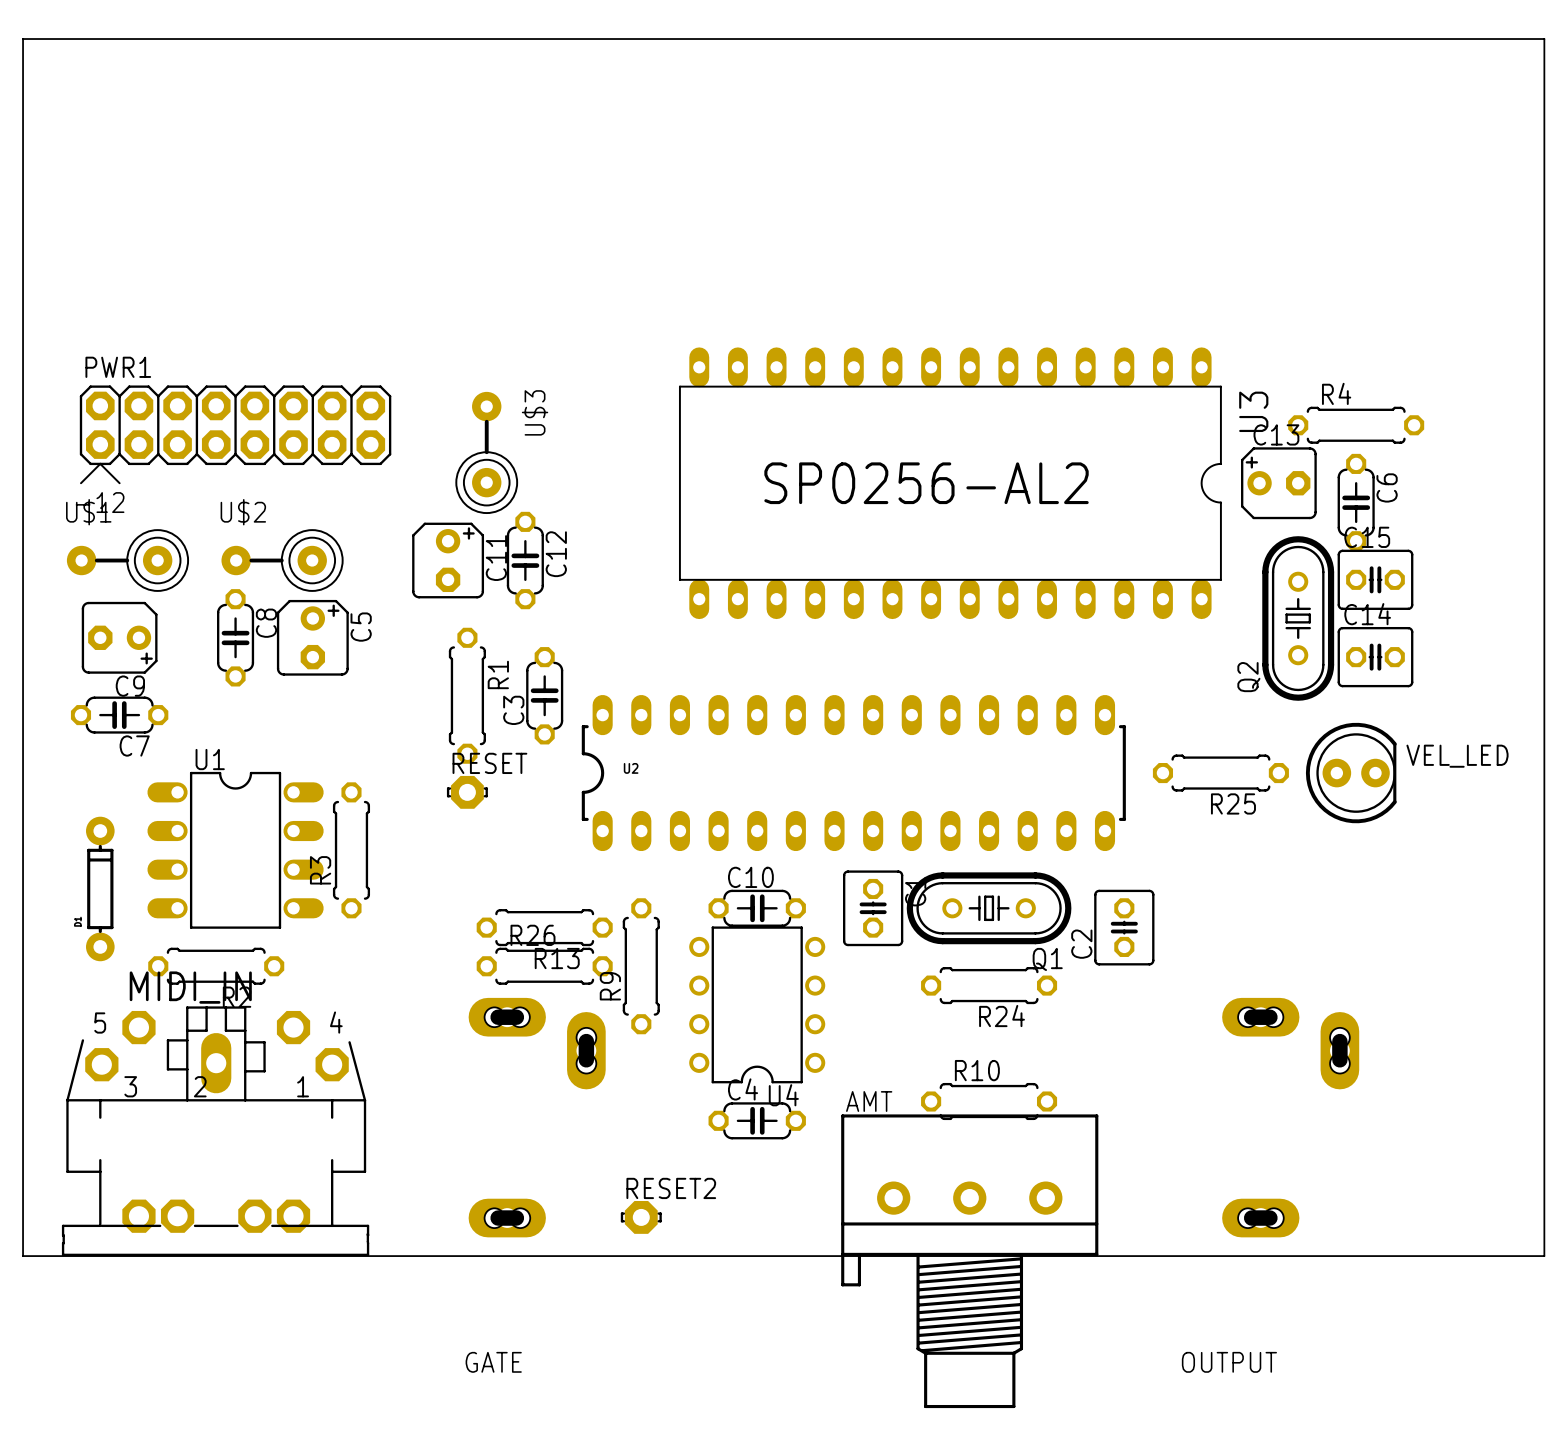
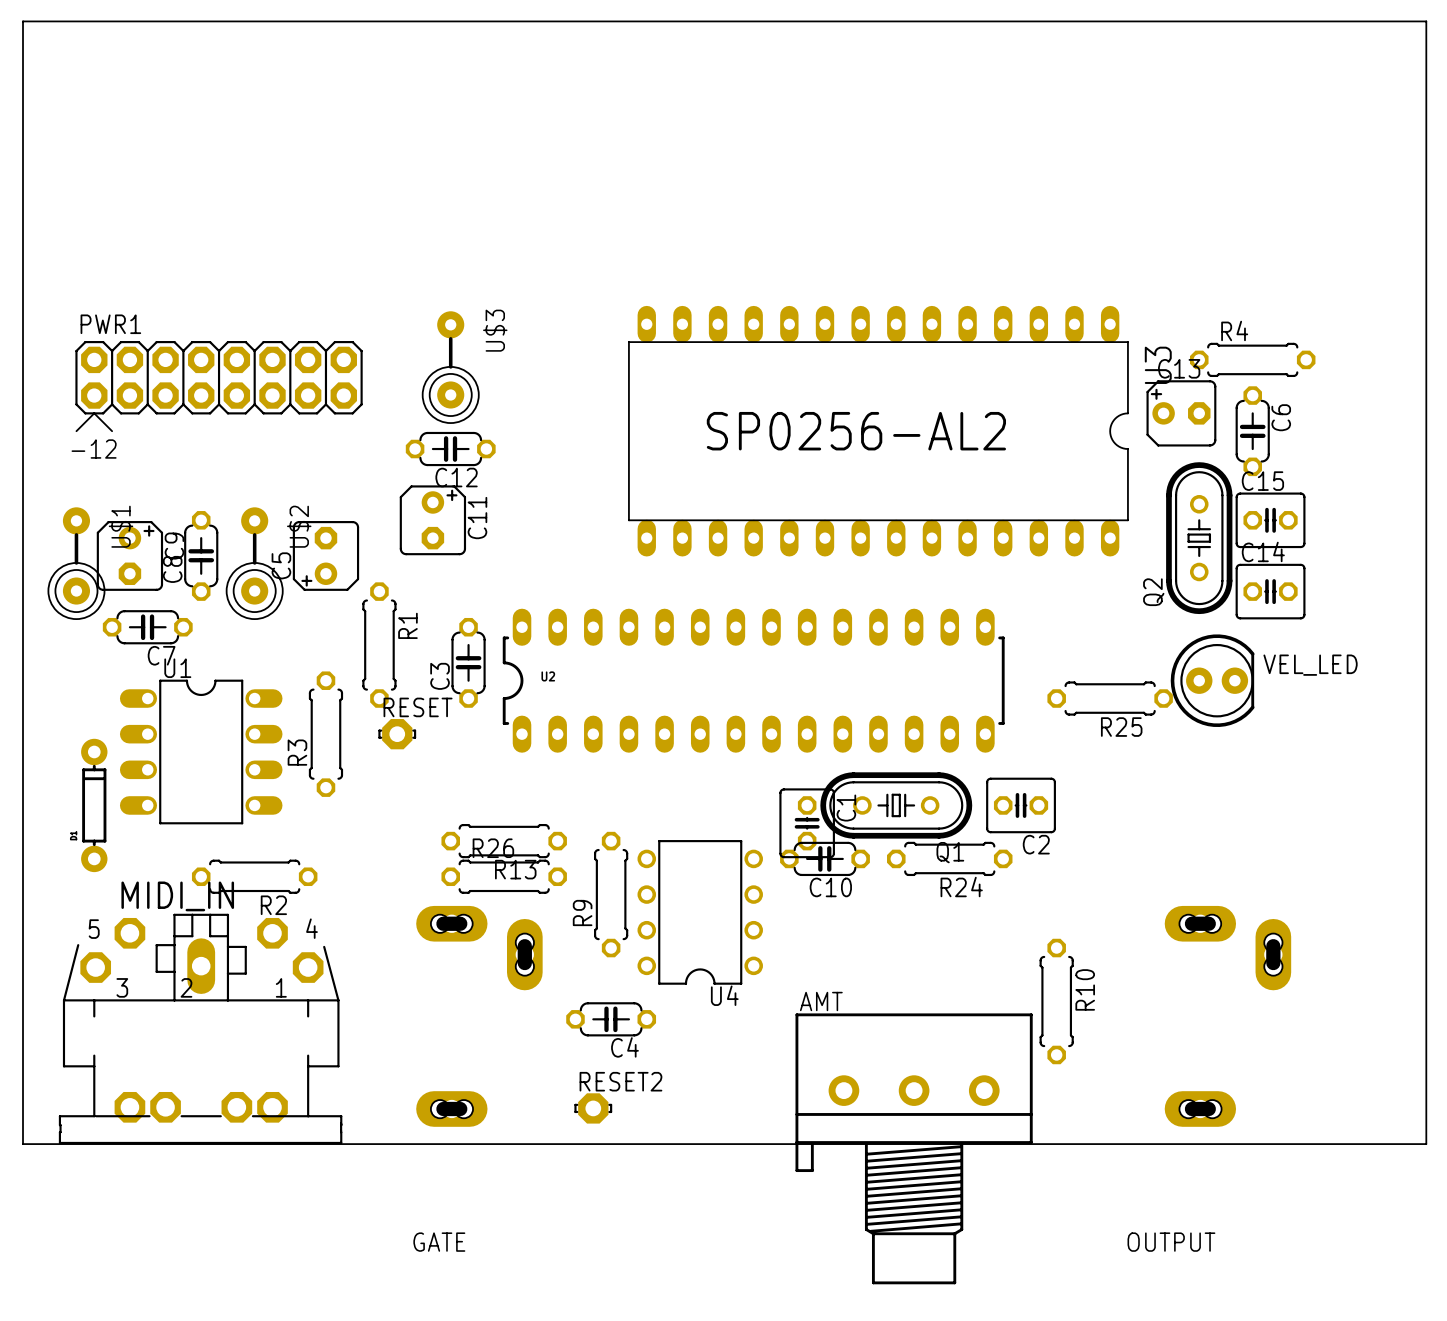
R4 position: (1356, 425) -> (1252, 359)
U$3 position: (486, 452) -> (450, 367)
C13 position: (1278, 483) -> (1181, 413)
C6 position: (1356, 502) -> (1252, 431)
U$1 rotation: 0° (127, 560) -> 90° clockwise (76, 563)
U$1 position: (127, 560) -> (76, 563)
U$2 rotation: 0° (282, 560) -> 90° clockwise (254, 563)
C11 position: (448, 560) -> (432, 520)
C12 rotation: 0° (525, 560) -> 90° clockwise (450, 449)
C12 position: (525, 560) -> (450, 449)
Q2 position: (1298, 618) -> (1199, 538)
C9 rotation: 0° (119, 637) -> 90° counterclockwise (129, 555)
C8 rotation: 0° (235, 637) -> 180° (201, 555)
C5 rotation: 0° (312, 637) -> 180° (325, 555)
R1 position: (467, 695) -> (379, 645)
C3 position: (544, 695) -> (468, 662)
C7 position: (119, 715) -> (147, 627)
U2 position: (853, 773) -> (753, 680)
R25 position: (1220, 773) -> (1110, 698)
VEL_LED position: (1351, 773) -> (1212, 680)
RESET position: (467, 792) -> (397, 734)
U1 position: (235, 850) -> (201, 751)
R3 position: (351, 850) -> (325, 734)
C10 rotation: 0° (757, 908) -> 180° (824, 858)
C10 position: (757, 908) -> (824, 858)
Q1 position: (989, 908) -> (896, 805)
C2 rotation: 0° (1124, 927) -> 90° clockwise (1021, 805)
C2 name position: C2 (1081, 944) -> C2 (1036, 844)
R2 position: (216, 966) -> (254, 876)
R9 position: (641, 966) -> (611, 894)
R24 position: (989, 985) -> (949, 858)
R10 rotation: 0° (989, 1101) -> 90° clockwise (1056, 1001)
R10 position: (989, 1101) -> (1056, 1001)
GATE position: (537, 1117) -> (479, 1016)
OUTPUT position: (1290, 1117) -> (1227, 1016)
C4 rotation: 0° (757, 1120) -> 180° (611, 1019)
C4 position: (757, 1120) -> (611, 1019)
AMT position: (969, 1261) -> (914, 1148)

